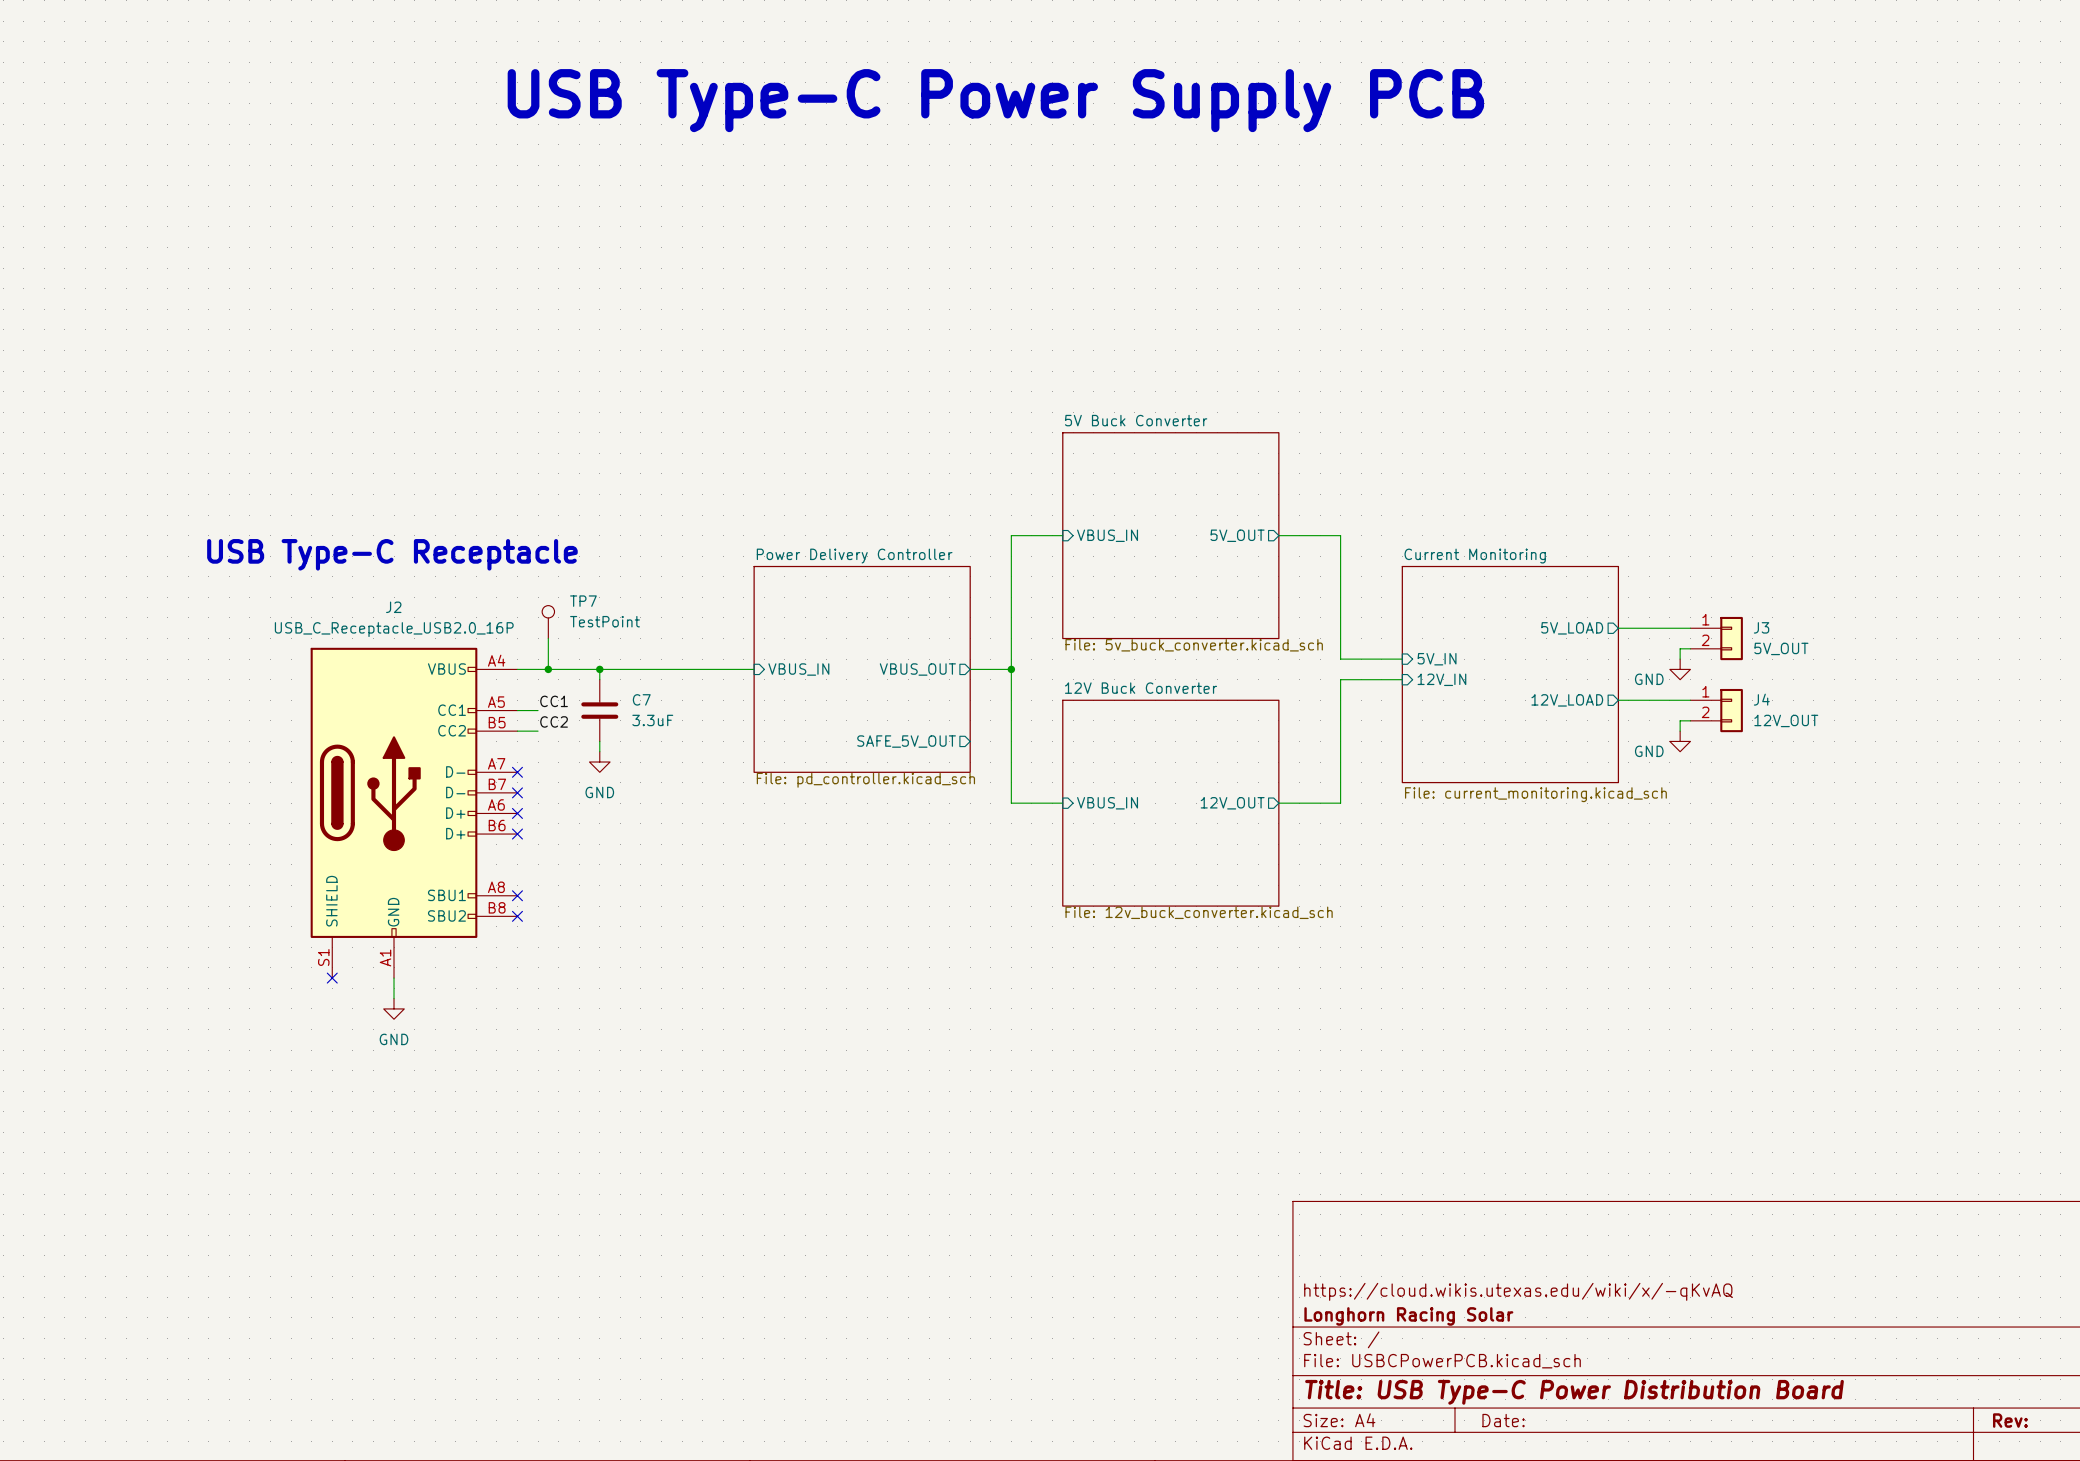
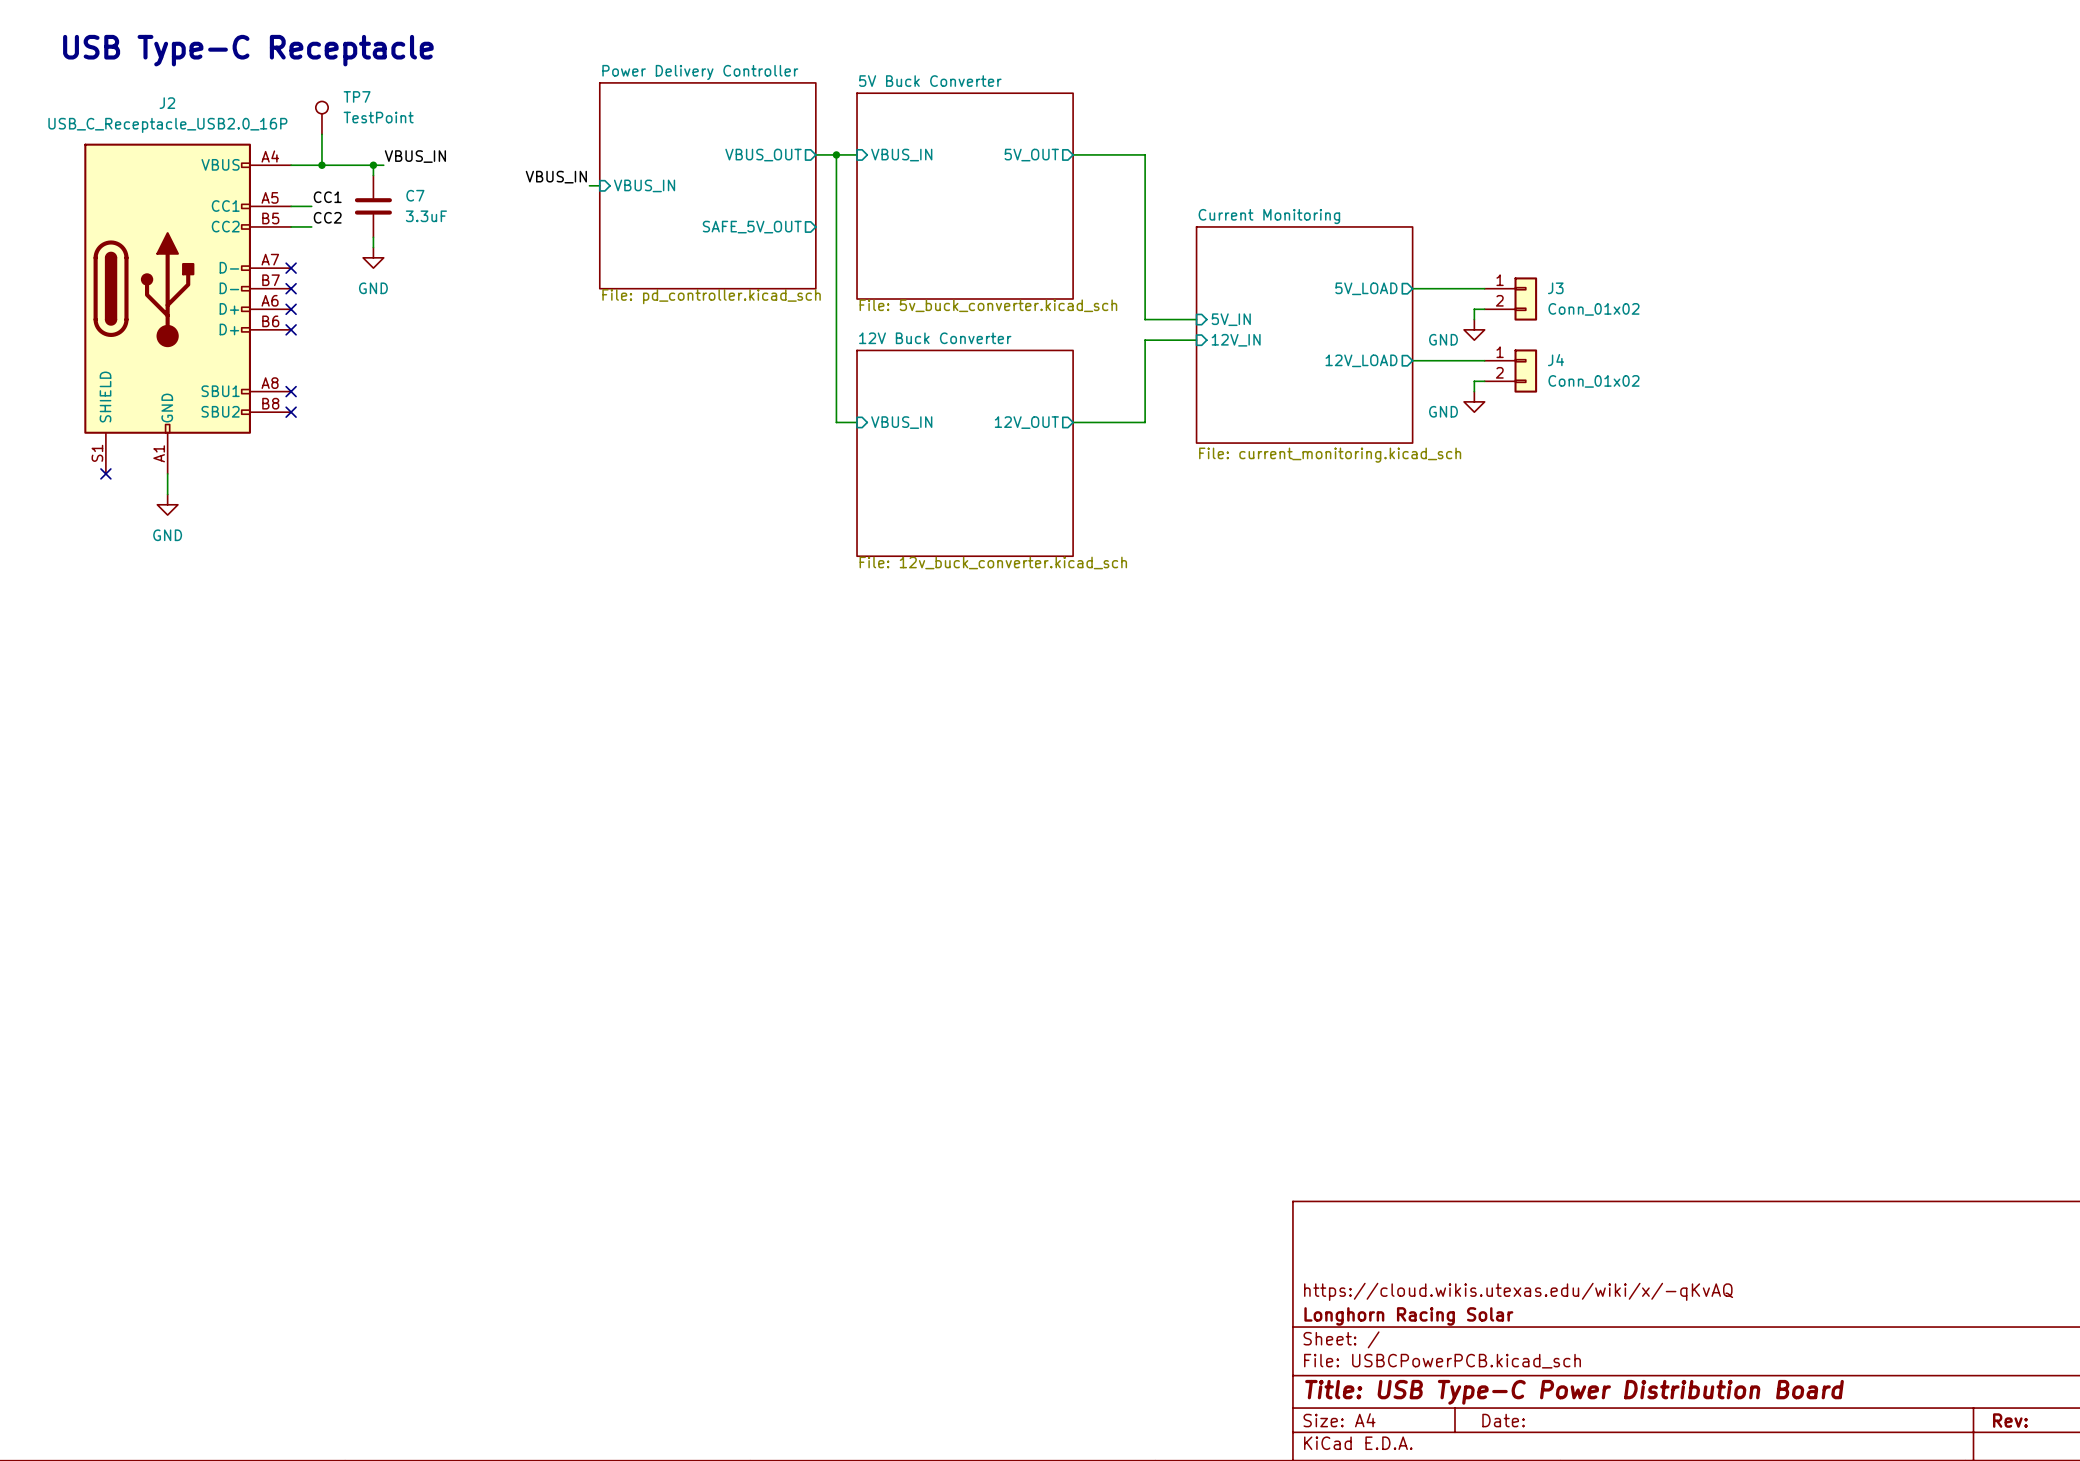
text: none -> USB Type-C Receptacle (248, 50)
text: USB Type-C Power Supply PCB (995, 100) -> none
wire: none -> (321, 134) (321, 165)
wire: none -> (815, 154) (857, 154)
wire: none -> (836, 154) (836, 422) (857, 422)
junction: none -> (836, 154)
wire: none -> (1073, 154) (1145, 154) (1145, 319) (1196, 319)
sheet pin: none -> VBUS_OUT (763, 155)
sheet pin: none -> VBUS_IN (901, 155)
sheet pin: none -> 5V_OUT (1031, 155)
label: none -> VBUS_IN (415, 156)
wire: none -> (291, 165) (383, 165)
junction: none -> (321, 165)
wire: none -> (373, 165) (373, 175)
junction: none -> (373, 165)
label: none -> VBUS_IN (556, 177)
wire: none -> (589, 185) (599, 185)
sheet pin: none -> VBUS_IN (644, 185)
sheet Power Delivery Controller: none -> File: pd_controller.kicad_sch (707, 185)
label: none -> CC1 (327, 197)
wire: none -> (291, 206) (311, 206)
label: none -> CC2 (327, 217)
wire: none -> (291, 226) (311, 226)
sheet pin: none -> SAFE_5V_OUT (752, 227)
wire: none -> (373, 237) (373, 247)
power symbol: none -> GND (373, 257)
no-connect mark: none -> (291, 268)
no-connect mark: none -> (291, 288)
sheet pin: none -> 5V_LOAD (1366, 288)
wire: none -> (1412, 288) (1484, 288)
no-connect mark: none -> (291, 309)
wire: none -> (1484, 309) (1474, 309) (1474, 319)
sheet pin: none -> 5V_IN (1231, 319)
no-connect mark: none -> (291, 329)
power symbol: none -> GND (1474, 329)
sheet Current Monitoring: none -> File: current_monitoring.kicad_sch (1304, 335)
wire: none -> (1196, 340) (1145, 340) (1145, 422) (1073, 422)
sheet pin: none -> 12V_IN (1236, 340)
sheet pin: none -> 12V_LOAD (1361, 360)
wire: none -> (1412, 360) (1484, 360)
wire: none -> (1484, 381) (1474, 381) (1474, 391)
no-connect mark: none -> (291, 391)
power symbol: none -> GND (1474, 401)
no-connect mark: none -> (291, 412)
sheet pin: none -> VBUS_IN (901, 422)
sheet pin: none -> 12V_OUT (1026, 422)
no-connect mark: none -> (105, 473)
wire: none -> (167, 473) (167, 494)
power symbol: none -> GND (167, 504)
wire: (1062, 535) (1011, 535) (1011, 803) (1062, 803) -> none
sheet pin: VBUS_IN (1107, 535) -> none
sheet 5V Buck Converter position: (1170, 535) -> (965, 196)
sheet pin: 5V_OUT (1237, 535) -> none
wire: (1278, 535) (1340, 535) (1340, 659) (1402, 659) -> none
text: USB Type-C Receptacle (392, 554) -> none
TP7 position: (548, 622) -> (321, 117)
sheet pin: 5V_LOAD (1572, 628) -> none
wire: (1618, 628) (1690, 628) -> none
wire: (548, 638) (548, 669) -> none
J3 position: (1716, 638) -> (1510, 299)
wire: (1690, 648) (1680, 648) (1680, 659) -> none
J3 value: 5V_OUT (1781, 648) -> Conn_01x02 (1593, 309)
sheet pin: 5V_IN (1437, 659) -> none
wire: (517, 669) (754, 669) -> none
junction: (548, 669) -> none
wire: (599, 669) (599, 679) -> none
junction: (599, 669) -> none
sheet pin: VBUS_IN (798, 669) -> none
sheet Power Delivery Controller: File: pd_controller.kicad_sch (862, 669) -> none
sheet pin: VBUS_OUT (917, 669) -> none
wire: (970, 669) (1011, 669) -> none
junction: (1011, 669) -> none
power symbol: GND (1680, 669) -> none
sheet Current Monitoring: File: current_monitoring.kicad_sch (1510, 674) -> none
wire: (1402, 679) (1340, 679) (1340, 803) (1278, 803) -> none
sheet pin: 12V_IN (1441, 679) -> none
sheet pin: 12V_LOAD (1567, 700) -> none
wire: (1618, 700) (1690, 700) -> none
label: CC1 (554, 701) -> none
wire: (517, 710) (538, 710) -> none
C7 position: (599, 710) -> (373, 206)
J4 position: (1716, 710) -> (1510, 371)
wire: (1690, 720) (1680, 720) (1680, 731) -> none
J4 value: 12V_OUT (1786, 720) -> Conn_01x02 (1593, 381)
label: CC2 (554, 721) -> none
wire: (517, 731) (538, 731) -> none
wire: (599, 741) (599, 751) -> none
sheet pin: SAFE_5V_OUT (906, 741) -> none
power symbol: GND (1680, 741) -> none
power symbol: GND (599, 762) -> none
no-connect mark: (517, 772) -> none
no-connect mark: (517, 792) -> none
sheet pin: VBUS_IN (1107, 803) -> none
sheet 12V Buck Converter position: (1170, 803) -> (965, 453)
sheet pin: 12V_OUT (1232, 803) -> none
J2 position: (414, 812) -> (187, 308)
no-connect mark: (517, 813) -> none
no-connect mark: (517, 834) -> none
no-connect mark: (517, 895) -> none
no-connect mark: (517, 916) -> none
no-connect mark: (332, 978) -> none
wire: (394, 978) (394, 998) -> none
power symbol: GND (394, 1008) -> none

